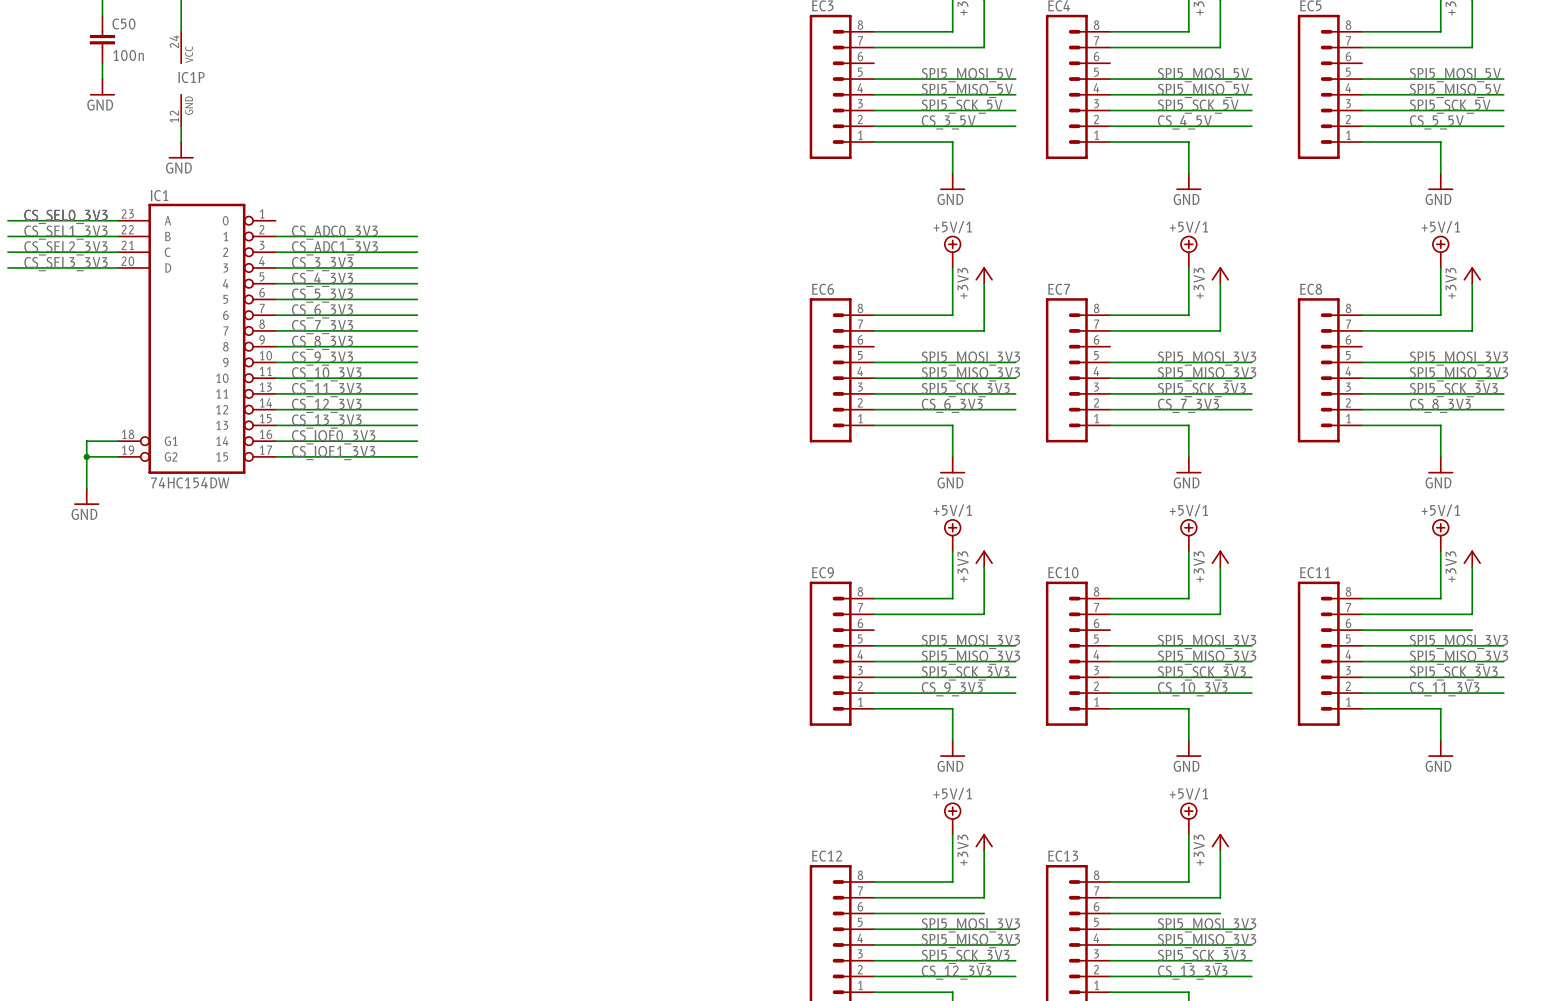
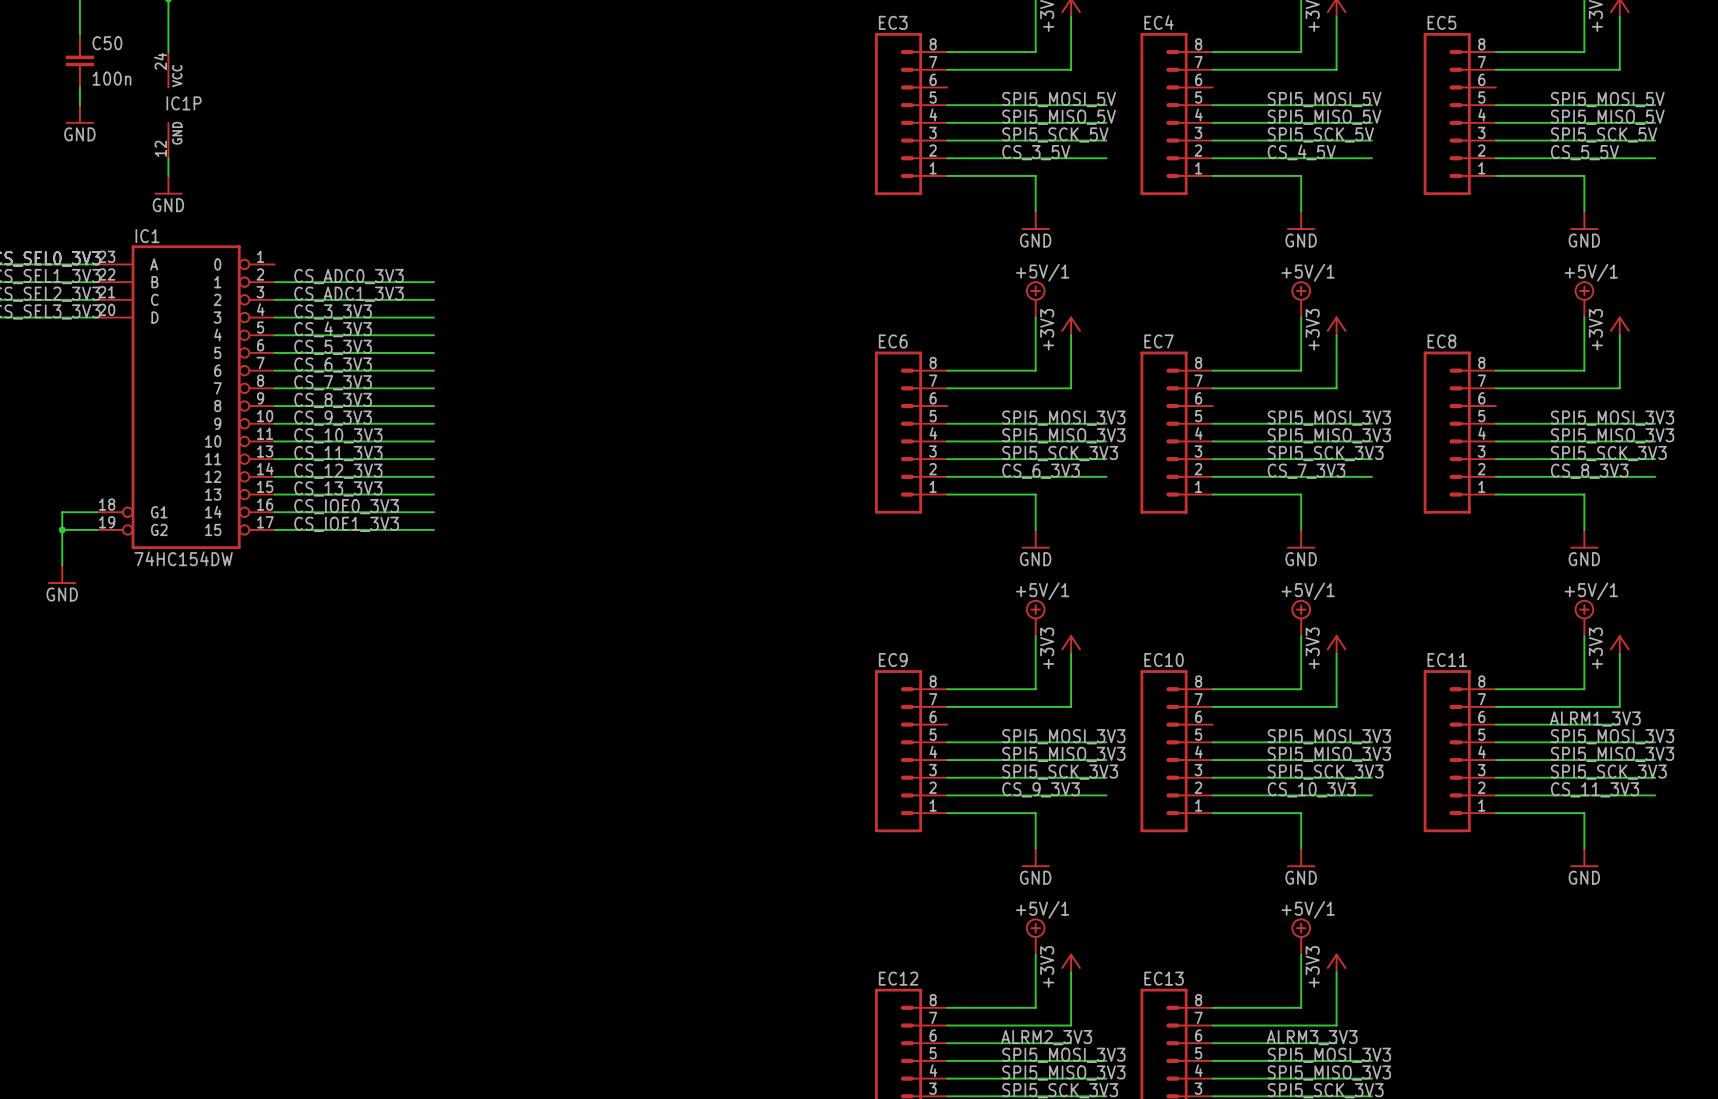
label: none -> ALRM1_3V3 (1595, 719)
label: none -> ALRM2_3V3 (1046, 1037)
label: none -> ALRM3_3V3 (1312, 1037)

